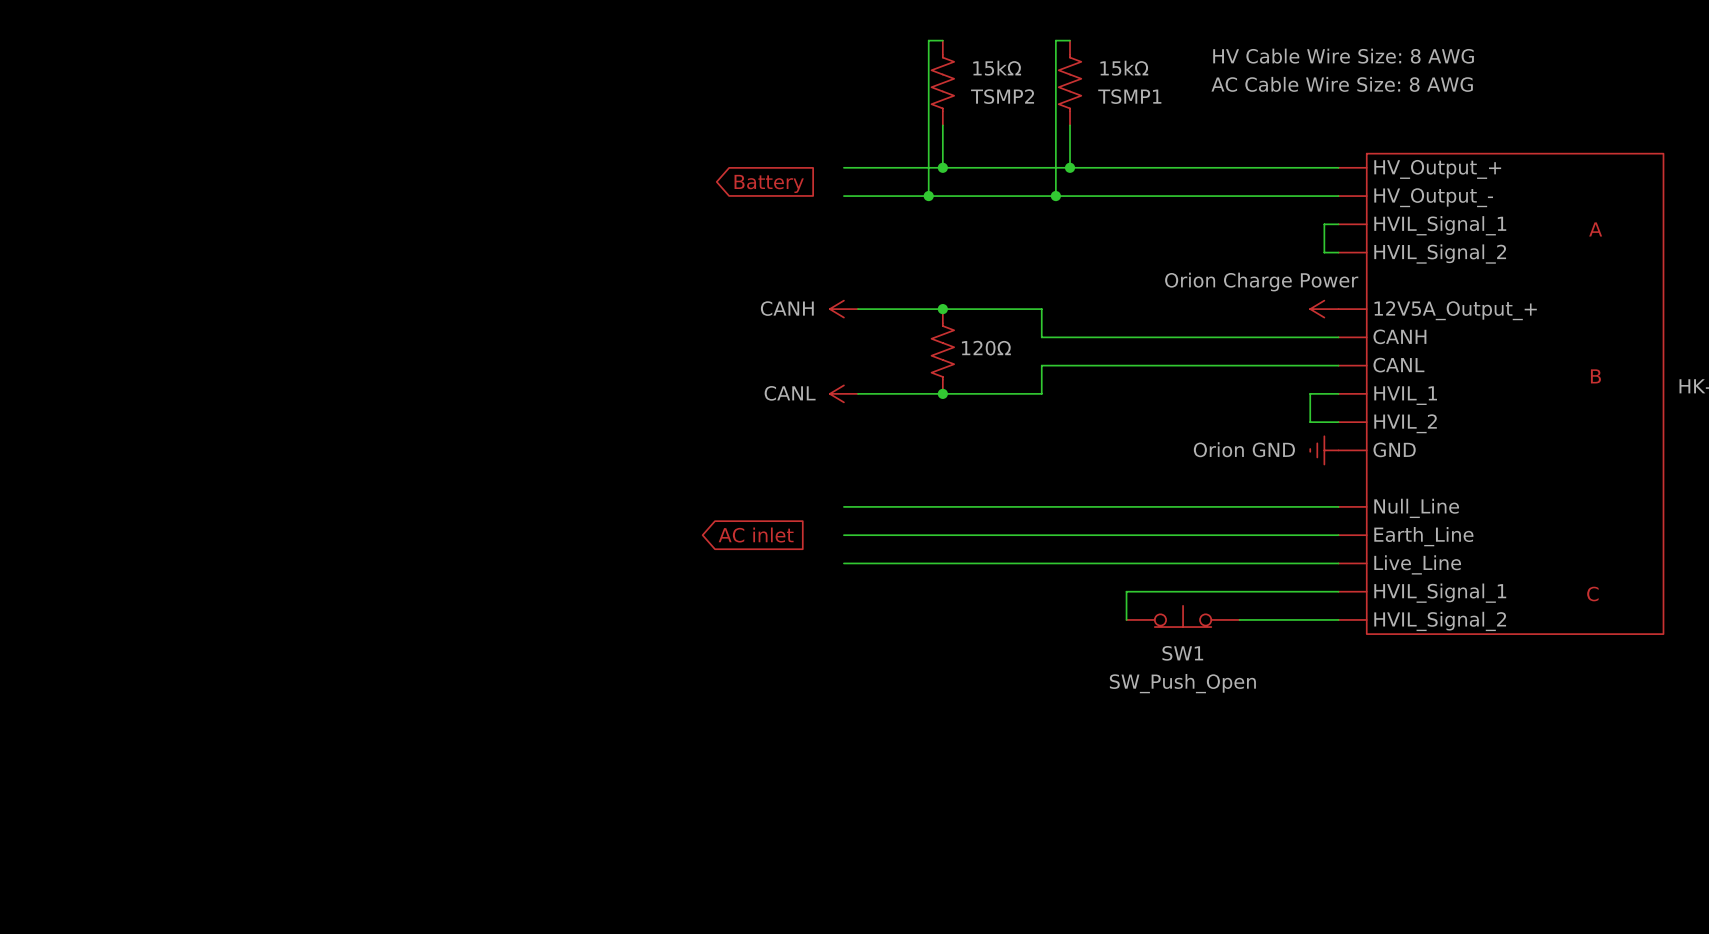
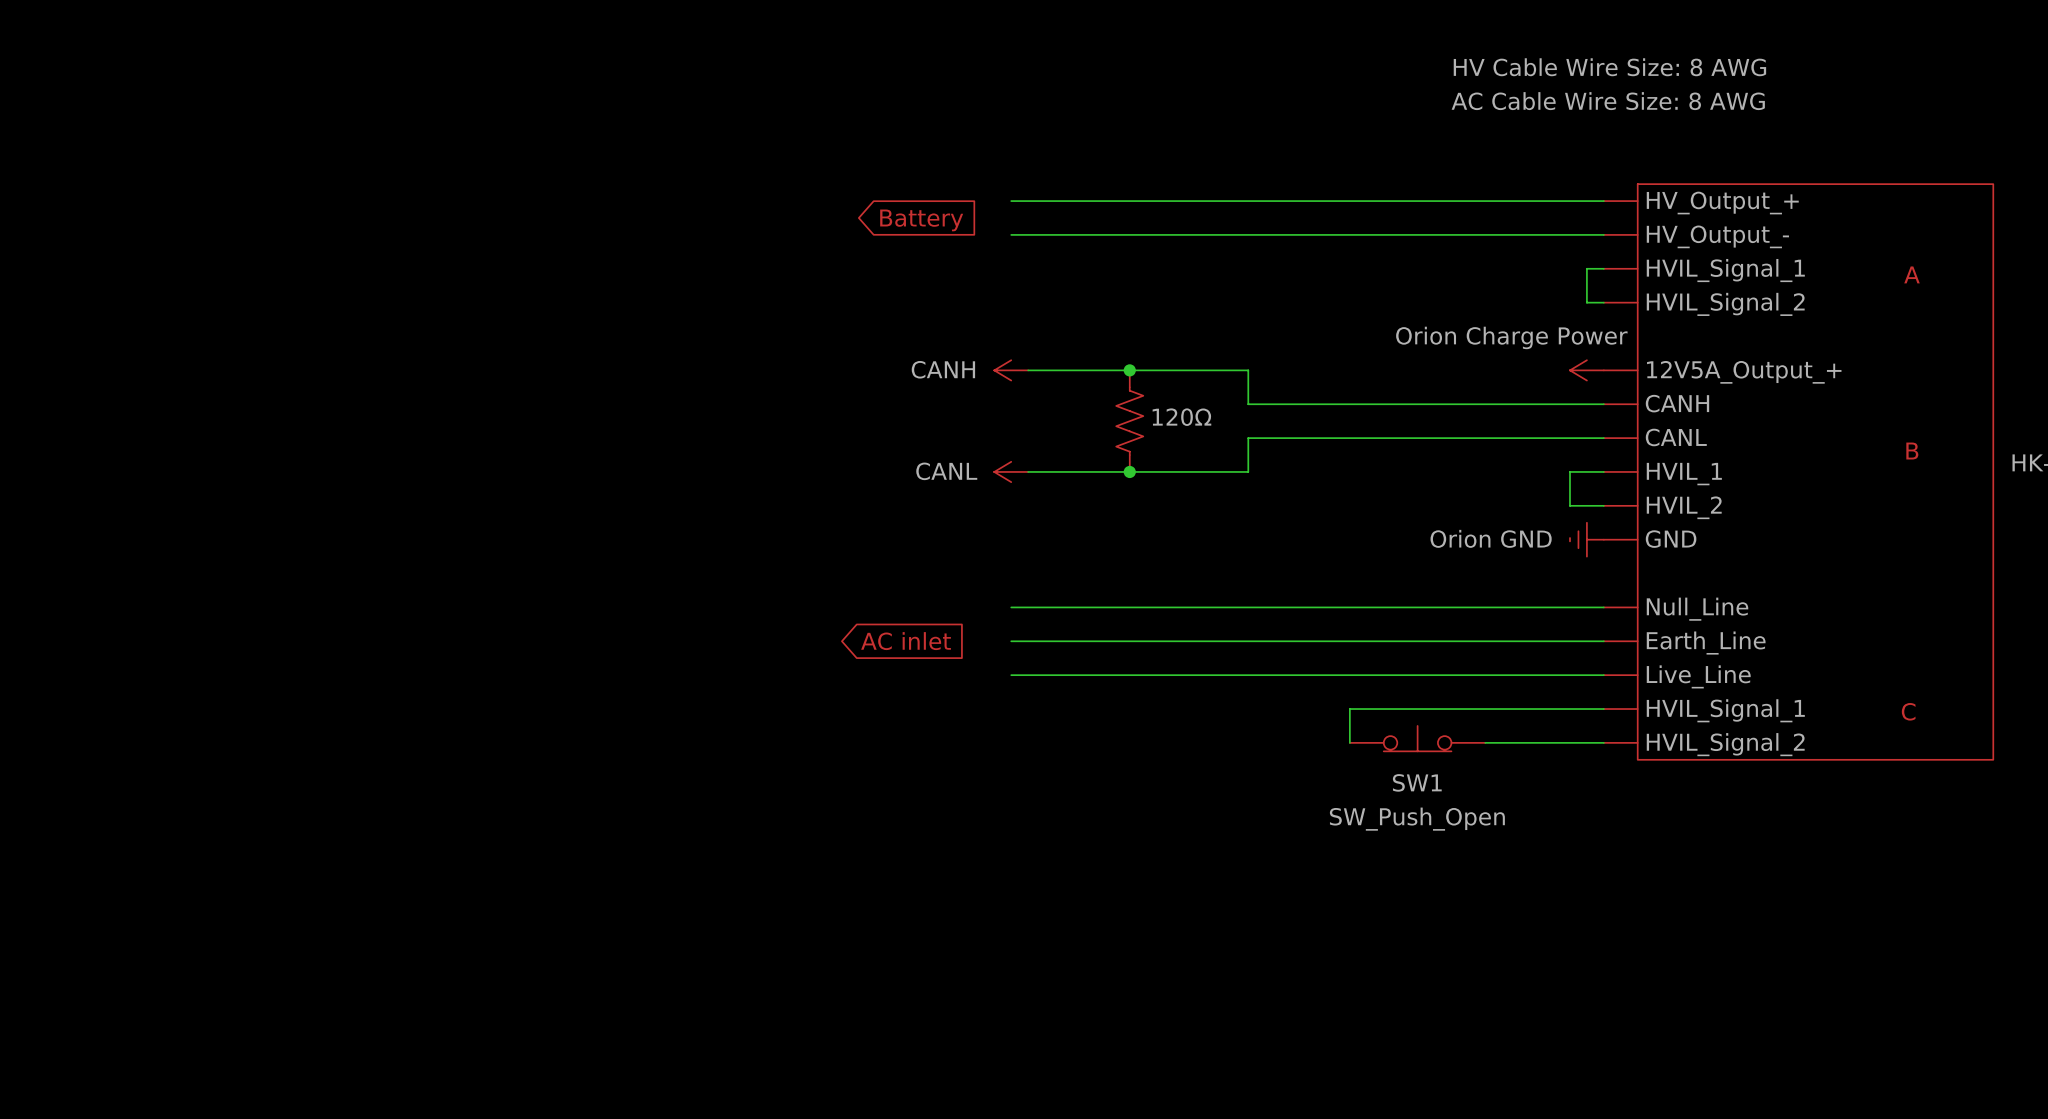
wire: (942, 40) (928, 40) (928, 196) -> none
wire: (1070, 40) (1055, 40) (1055, 196) -> none
15kΩ: TSMP2 (942, 83) -> none
15kΩ: TSMP1 (1070, 83) -> none
wire: (942, 125) (942, 167) -> none
wire: (1070, 125) (1070, 167) -> none
junction: (942, 167) -> none
junction: (1070, 167) -> none
junction: (928, 196) -> none
junction: (1055, 196) -> none

